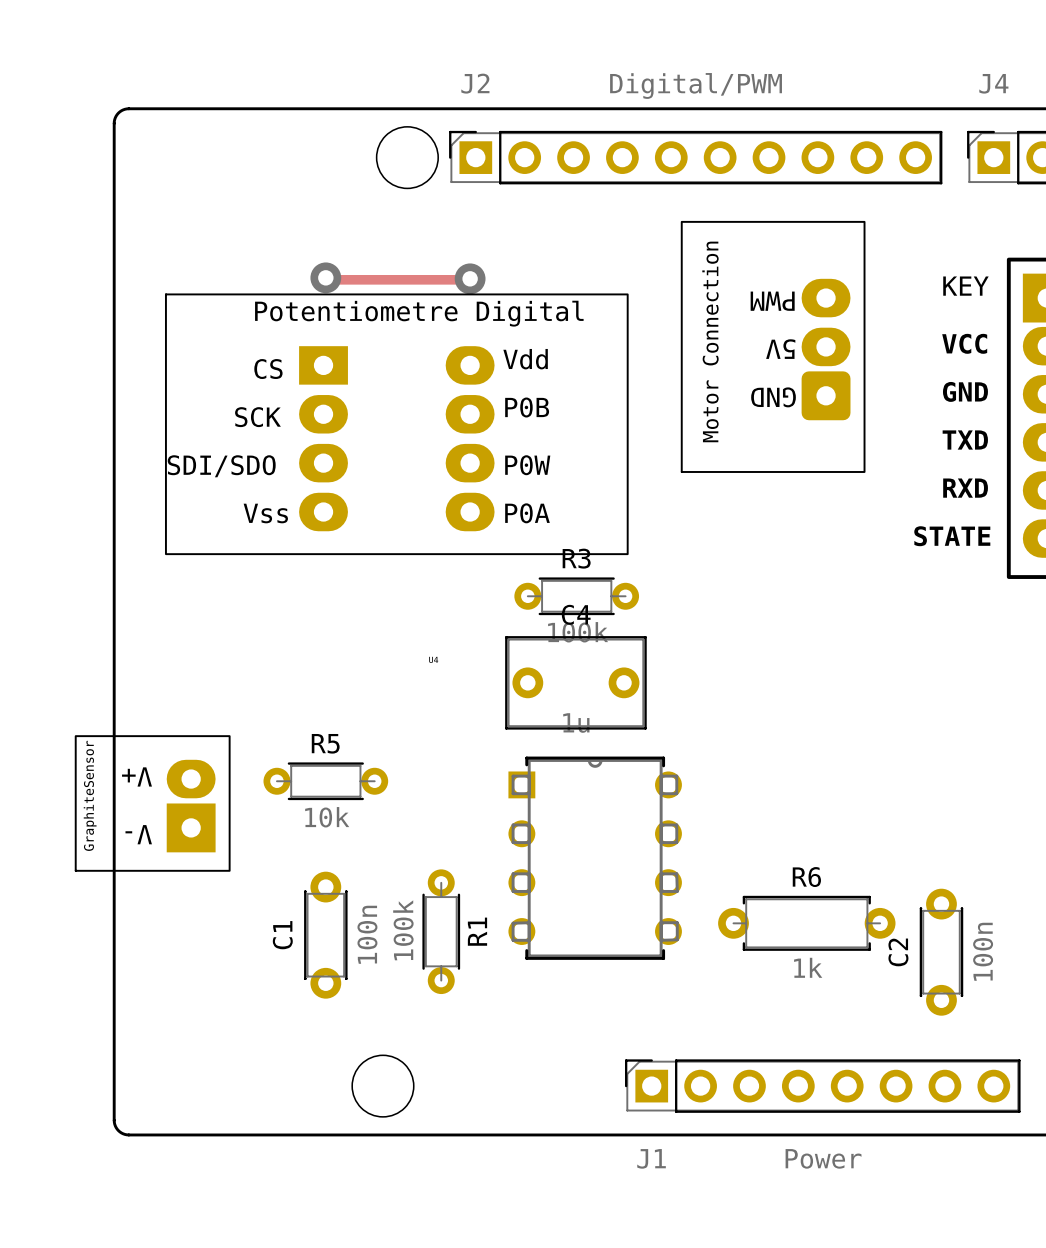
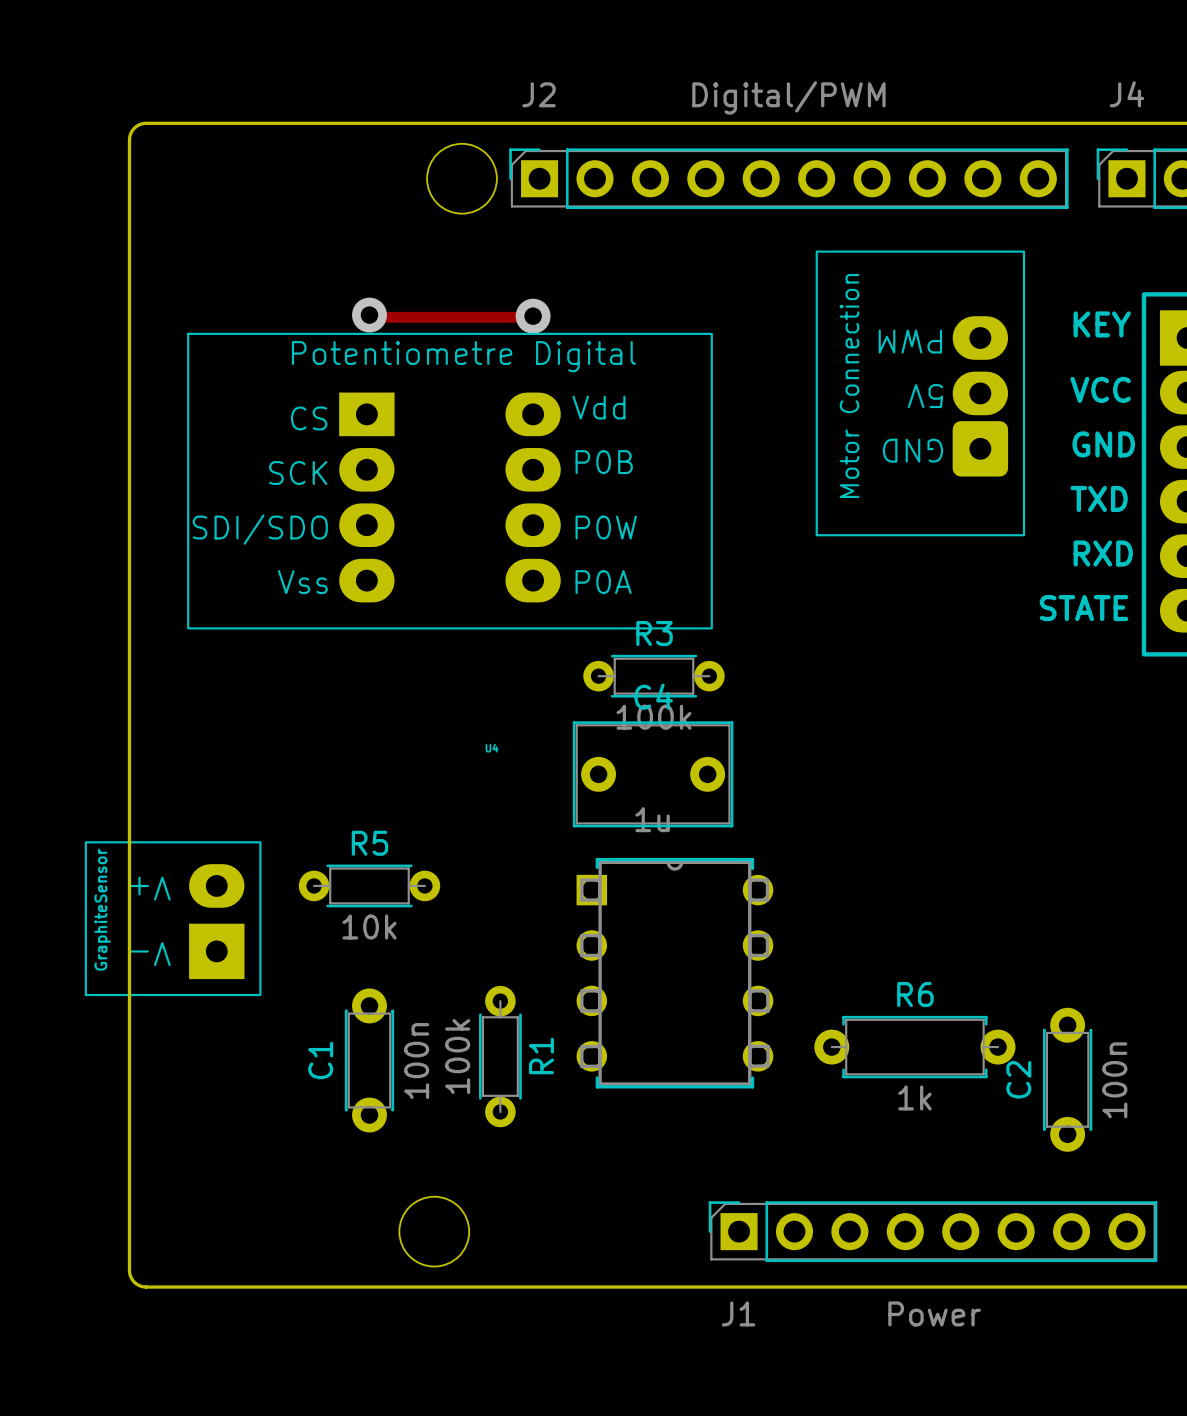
part position: (773, 346) -> (920, 393)
part footprint: [74, 735, 231, 872] -> [84, 841, 262, 997]

